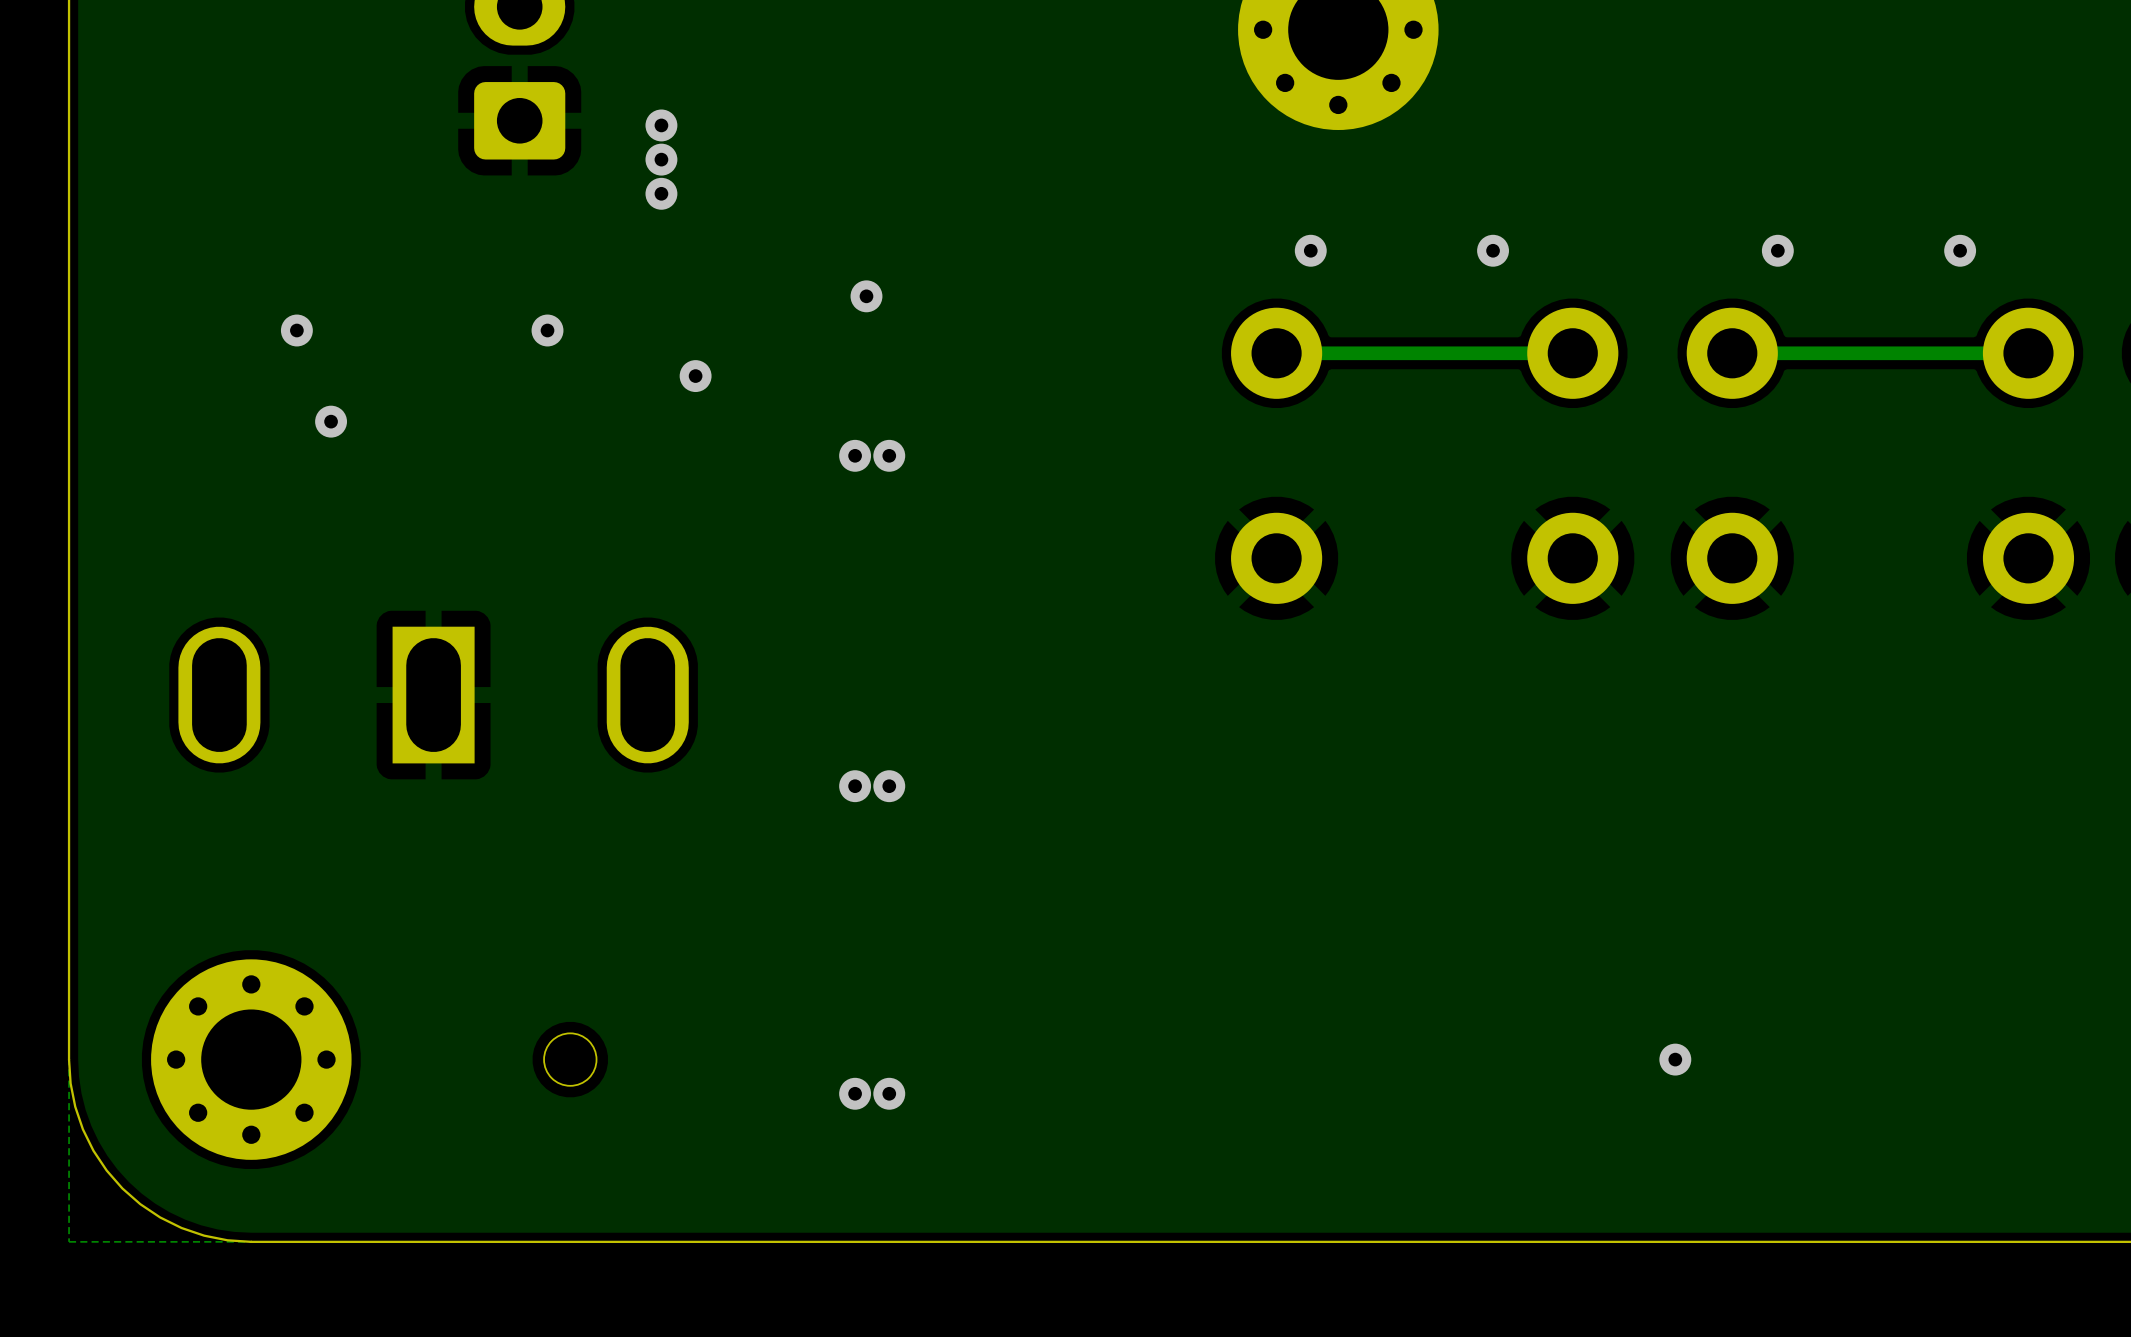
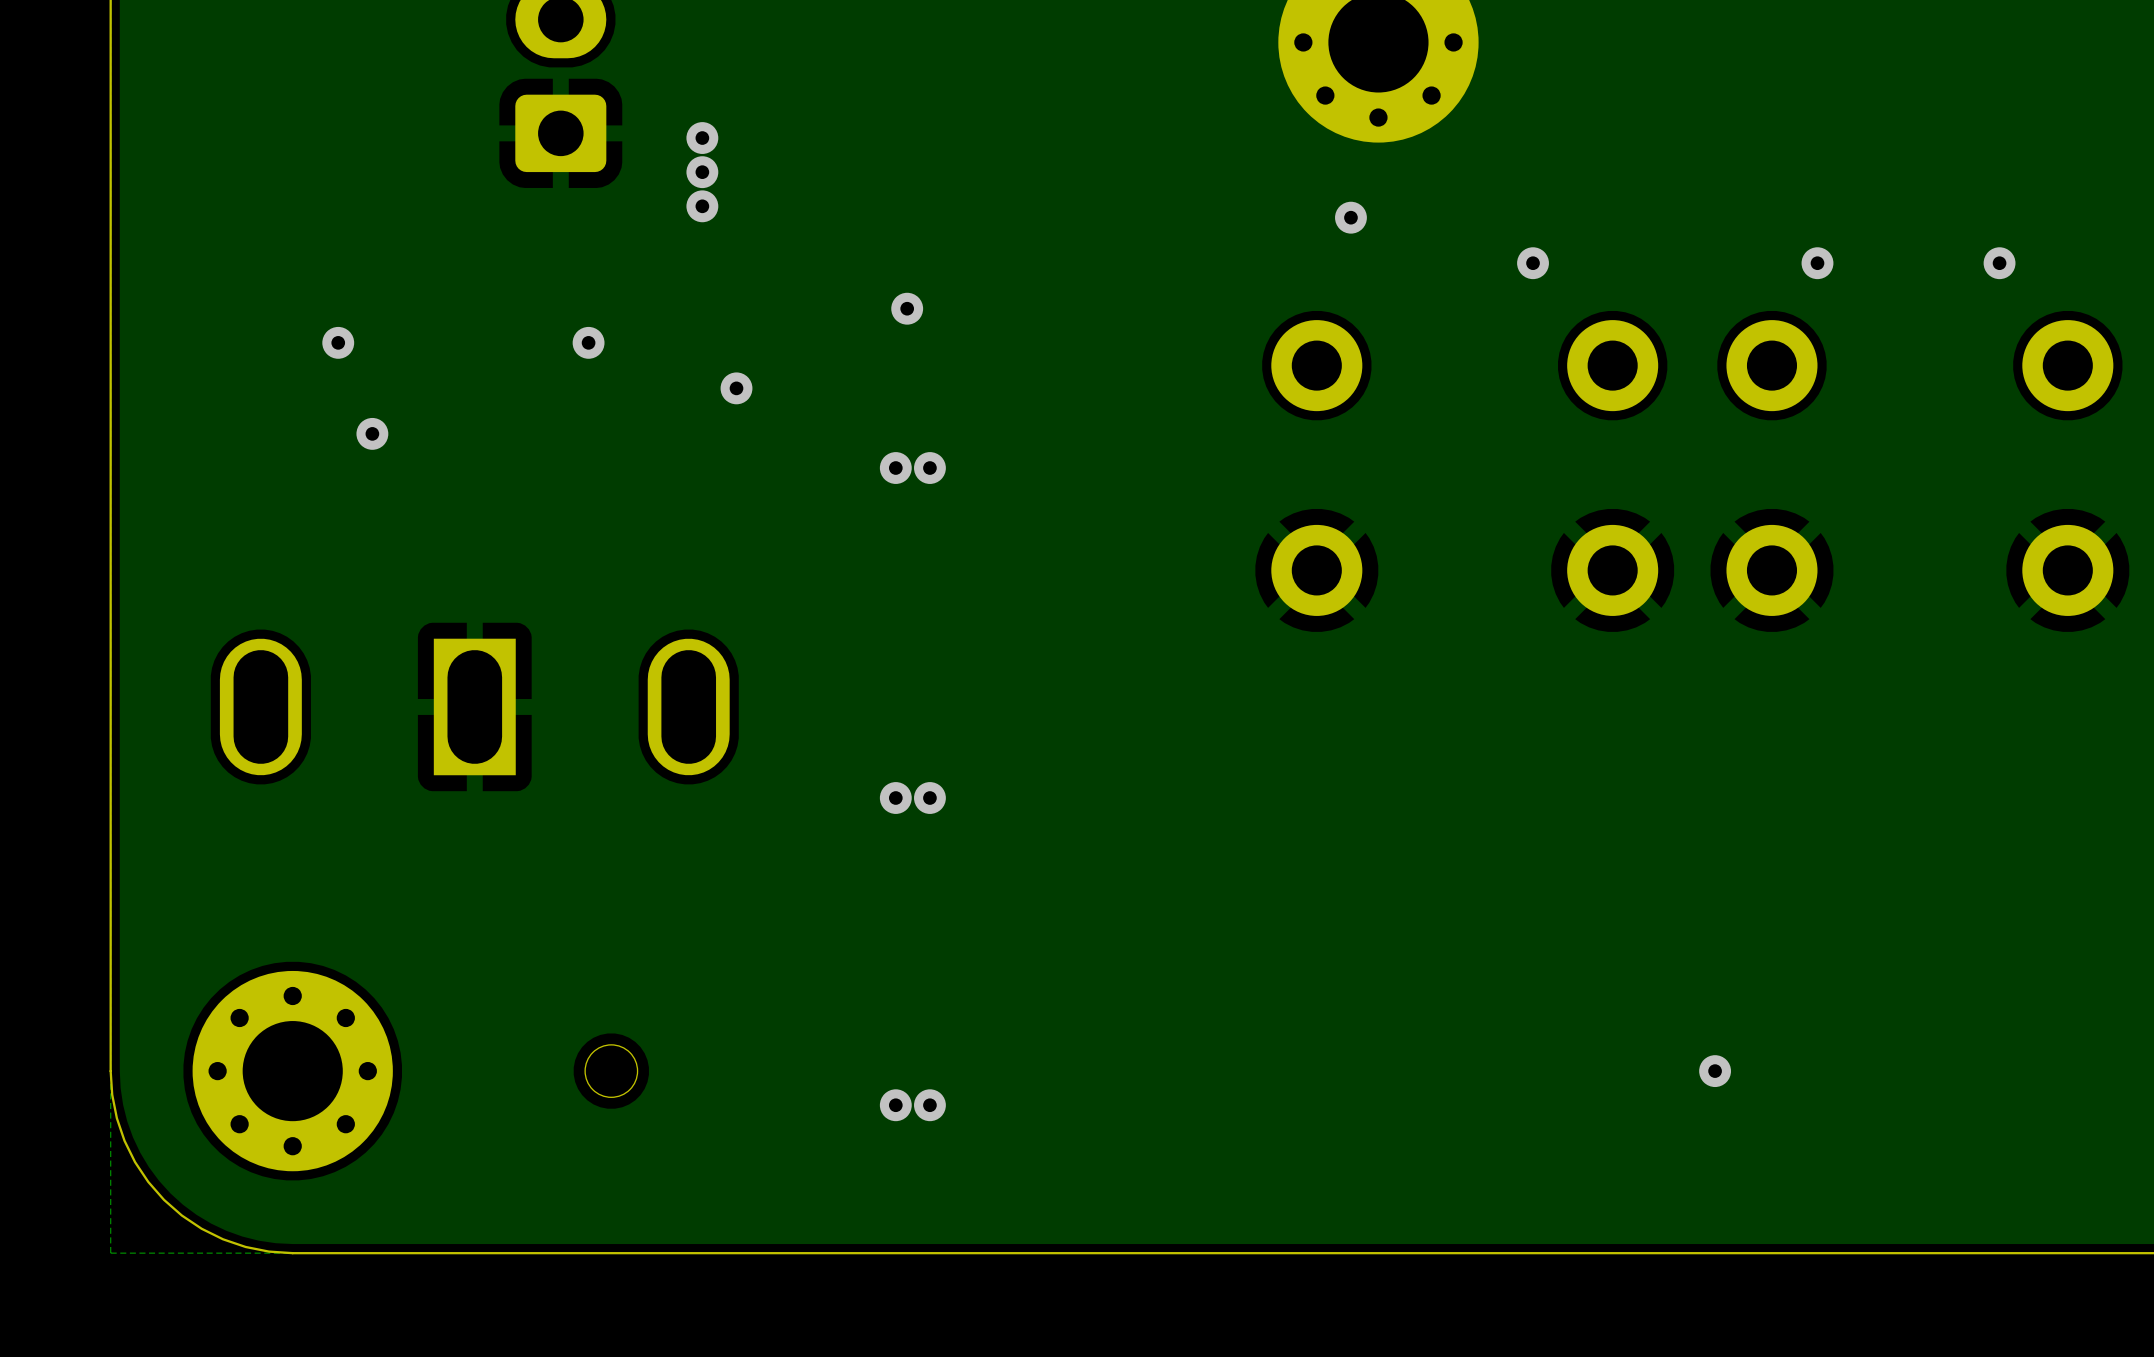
via position: (1310, 250) -> (1350, 217)
track: (1572, 353) (1276, 353) -> none
track: (2028, 353) (1732, 353) -> none

